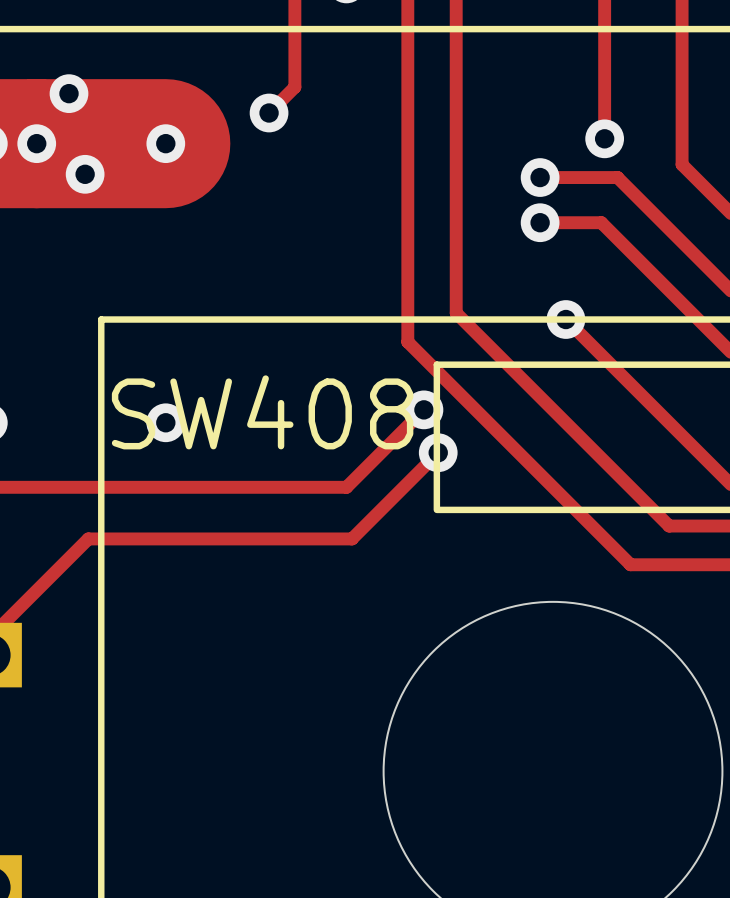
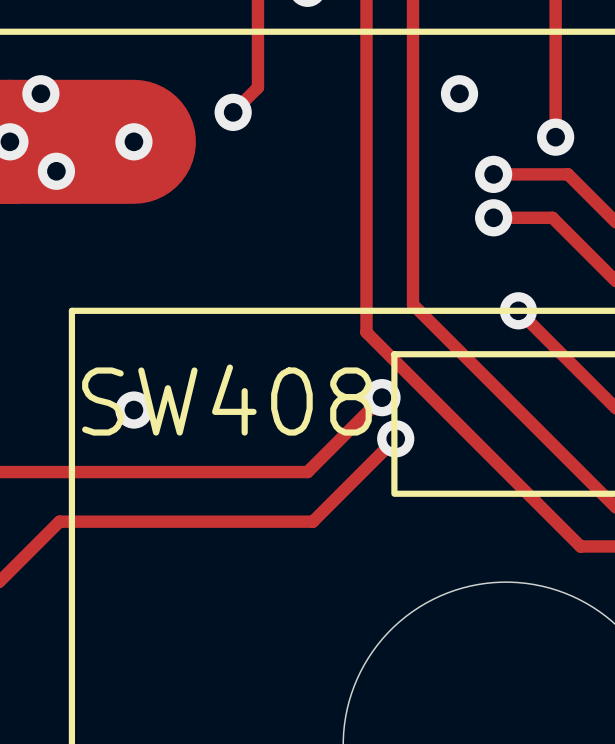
via: none -> (459, 93)

